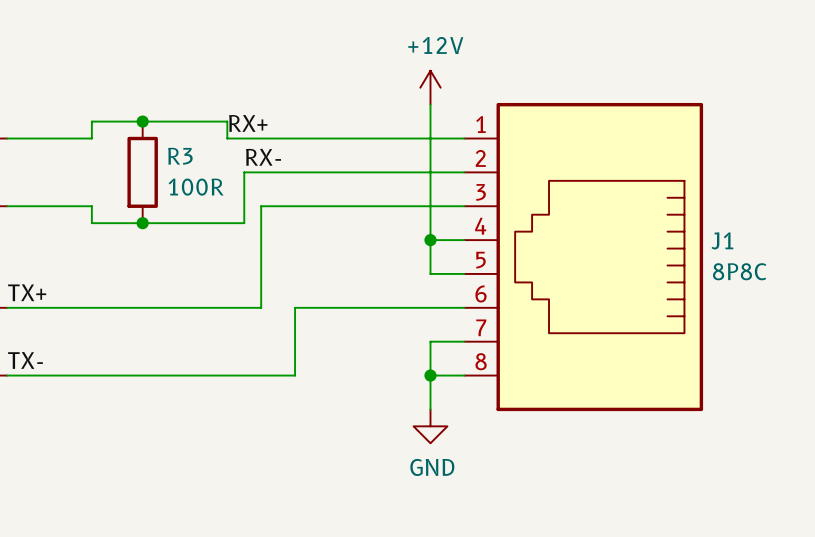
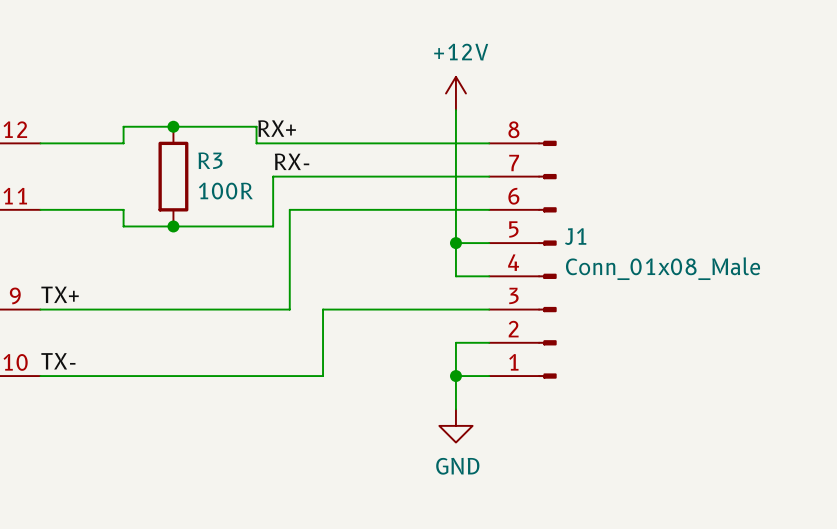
J1 symbol: [464, 102, 704, 412] -> [489, 140, 557, 379]
J1 name position: J1 (722, 240) -> J1 (575, 236)
J1 value: 8P8C (739, 271) -> Conn_01x08_Male (663, 268)

